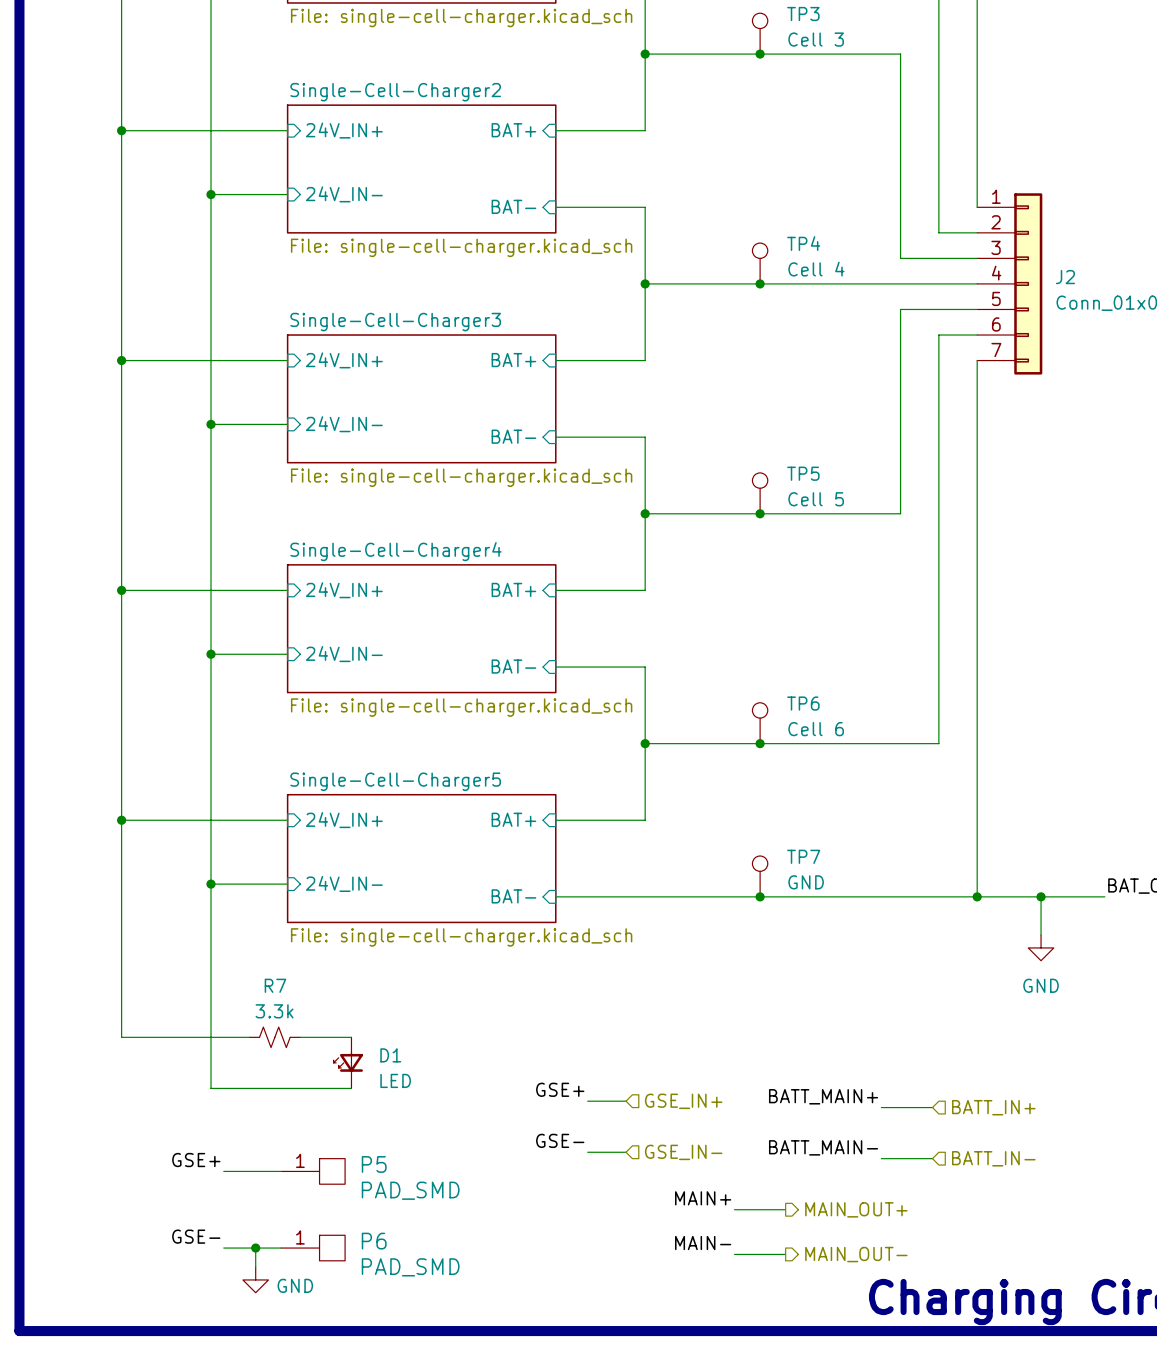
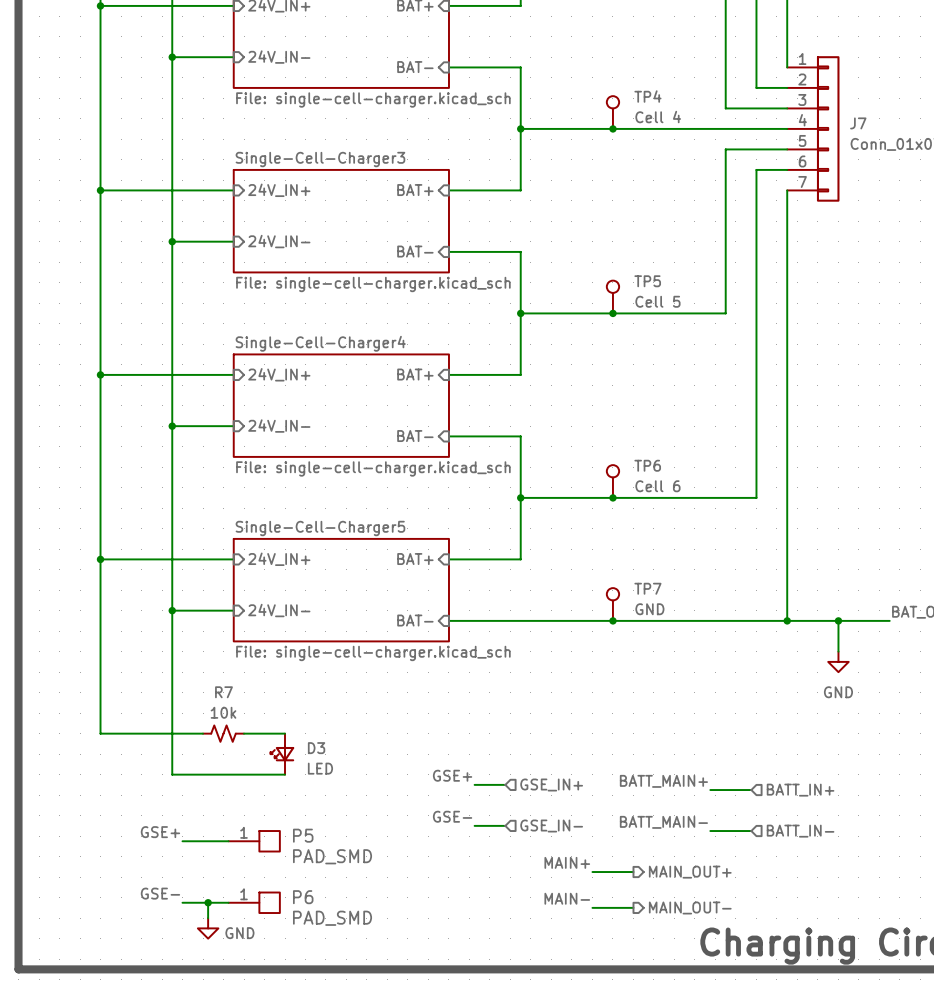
J2 name: J2 (1065, 277) -> J7 (858, 123)
R7 value: 3.3k (274, 1011) -> 10k (223, 712)
D1 name: D1 (390, 1055) -> D3 (316, 748)

